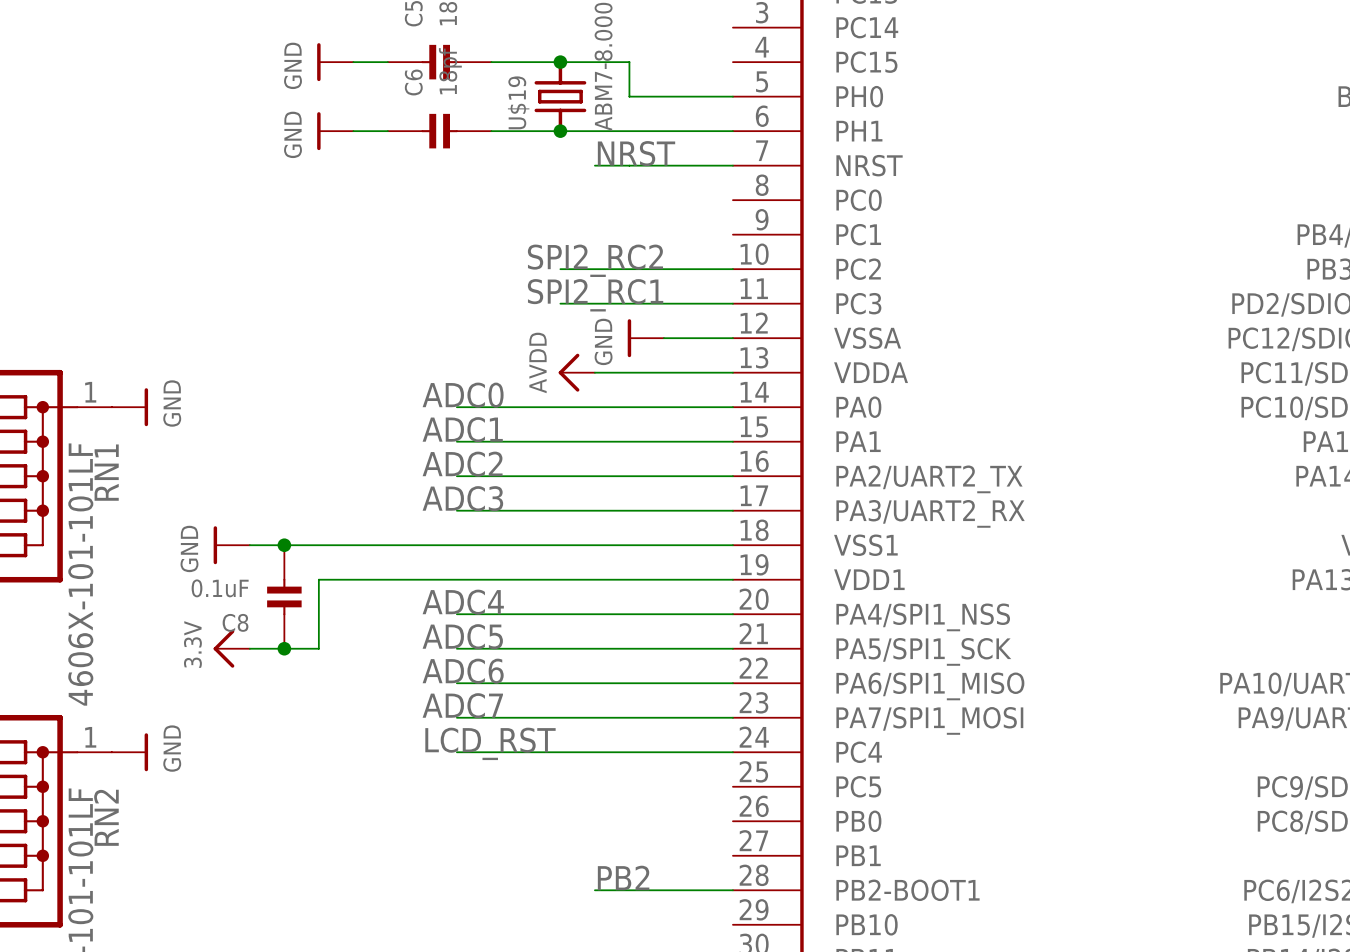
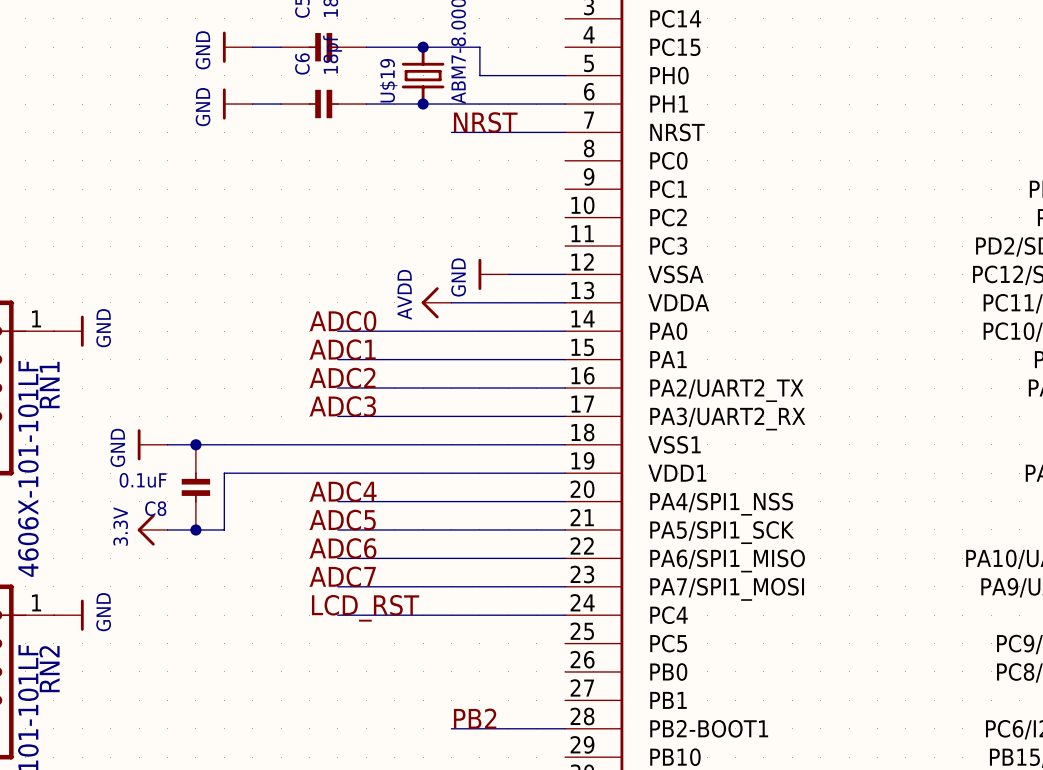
label: SPI2_RC2 (595, 260) -> none
wire: (560, 269) (732, 269) -> none
label: SPI2_RC1 (595, 295) -> none
wire: (560, 303) (732, 303) -> none

